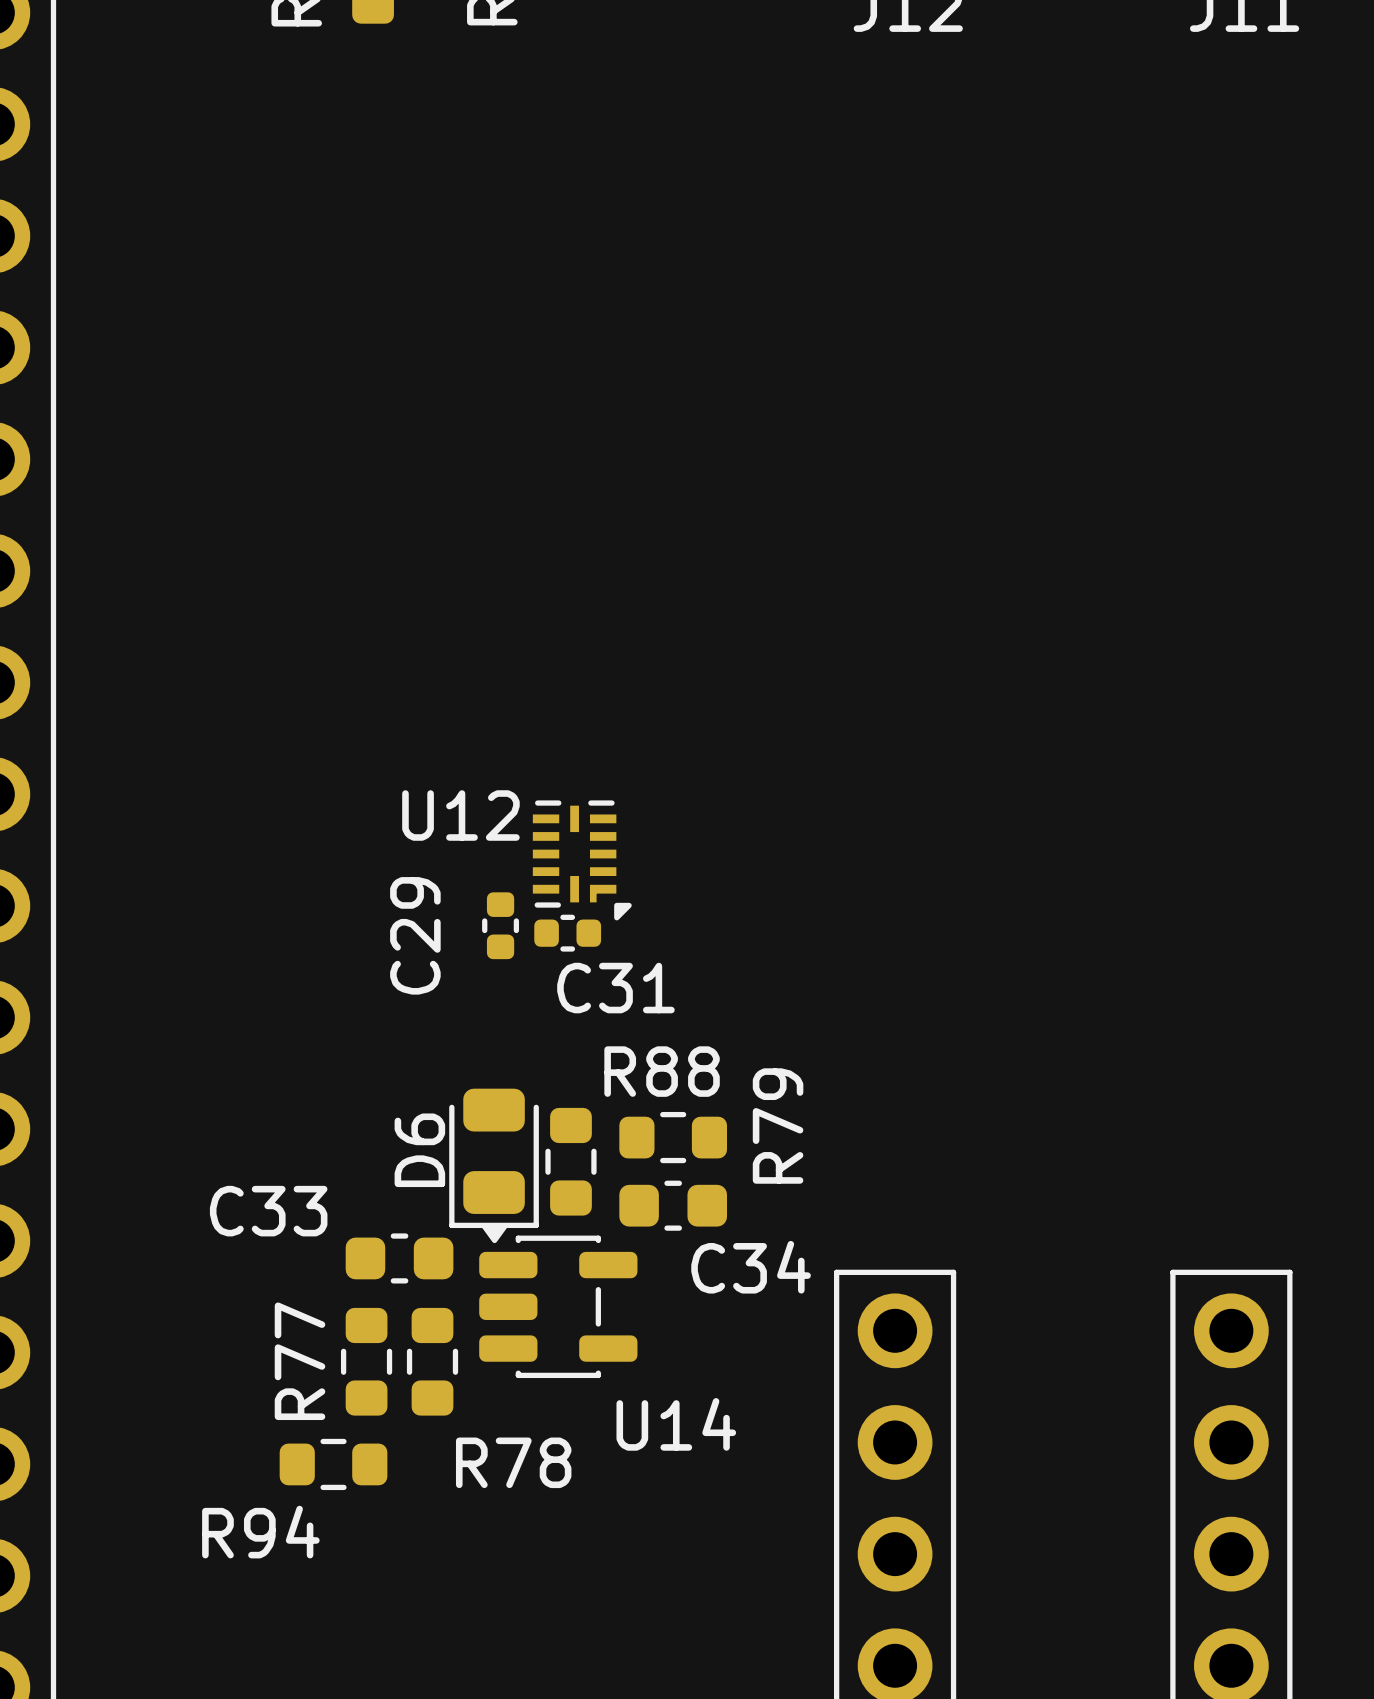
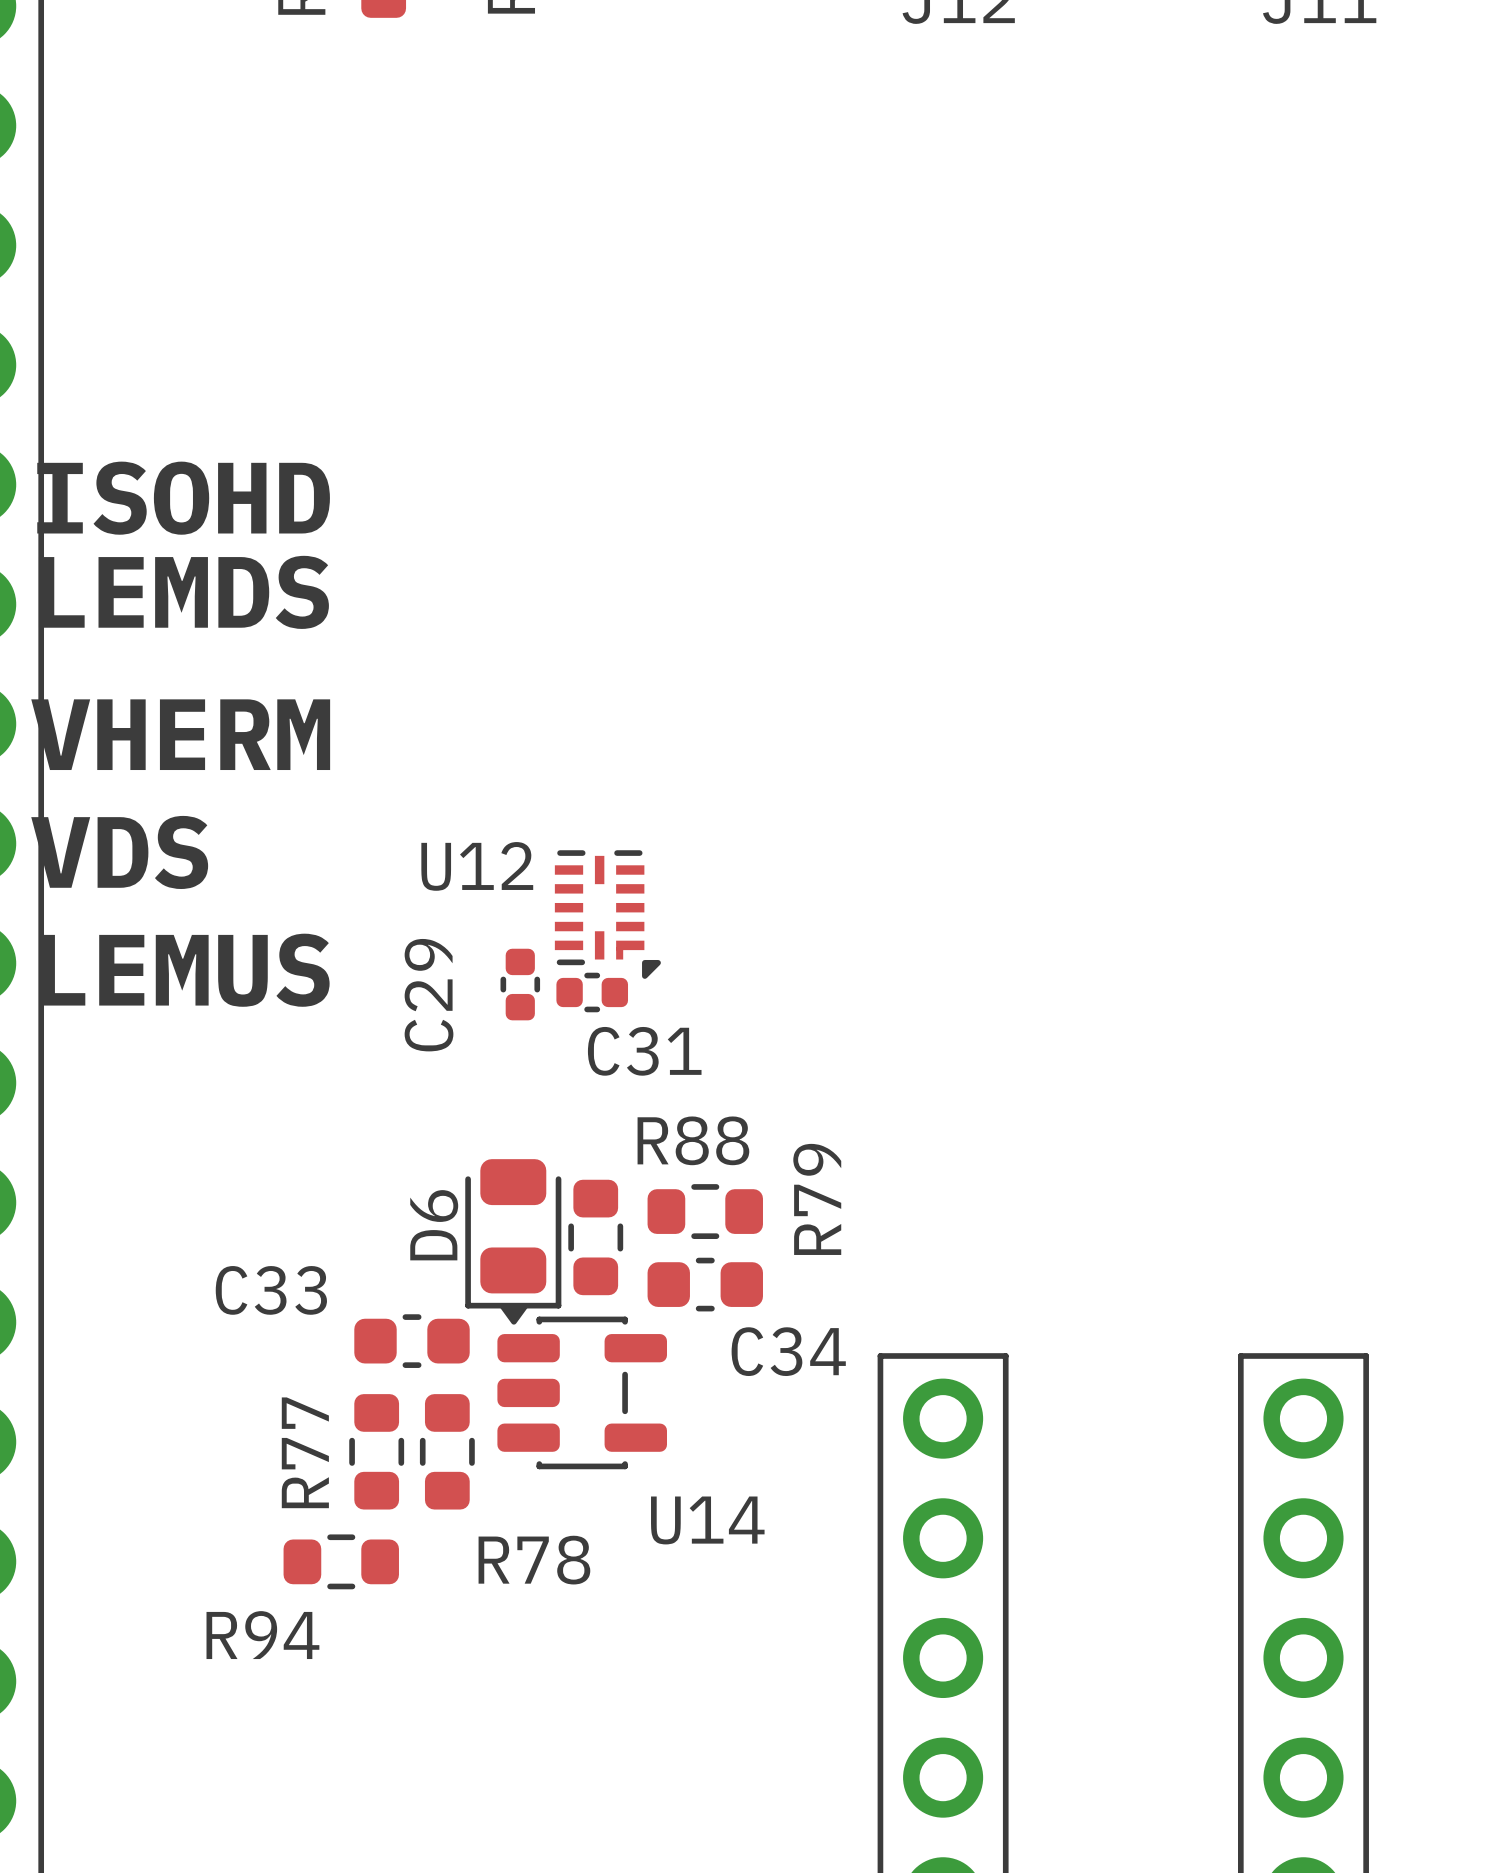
text: none -> ISOHD (183, 498)
text: none -> LEMDS (183, 592)
text: none -> VHERM (180, 734)
text: none -> VDS (119, 852)
text: none -> LEMUS (184, 970)

